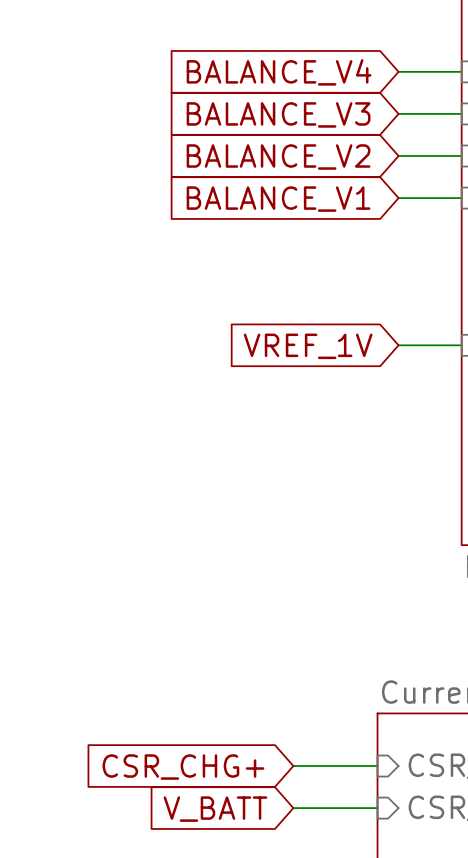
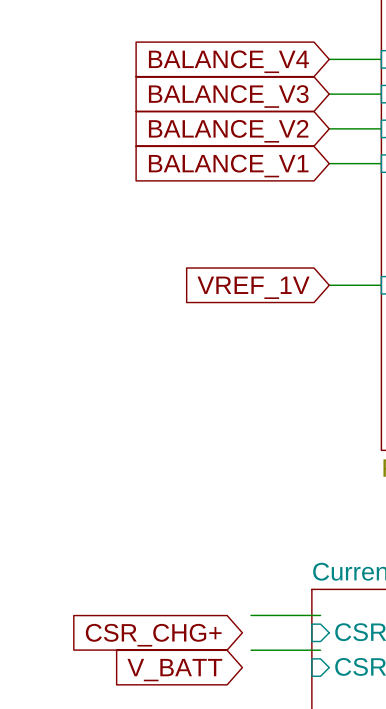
wire: (293, 766) (377, 766) -> (251, 615) (320, 615)
wire: (293, 808) (377, 808) -> (251, 650) (320, 650)

